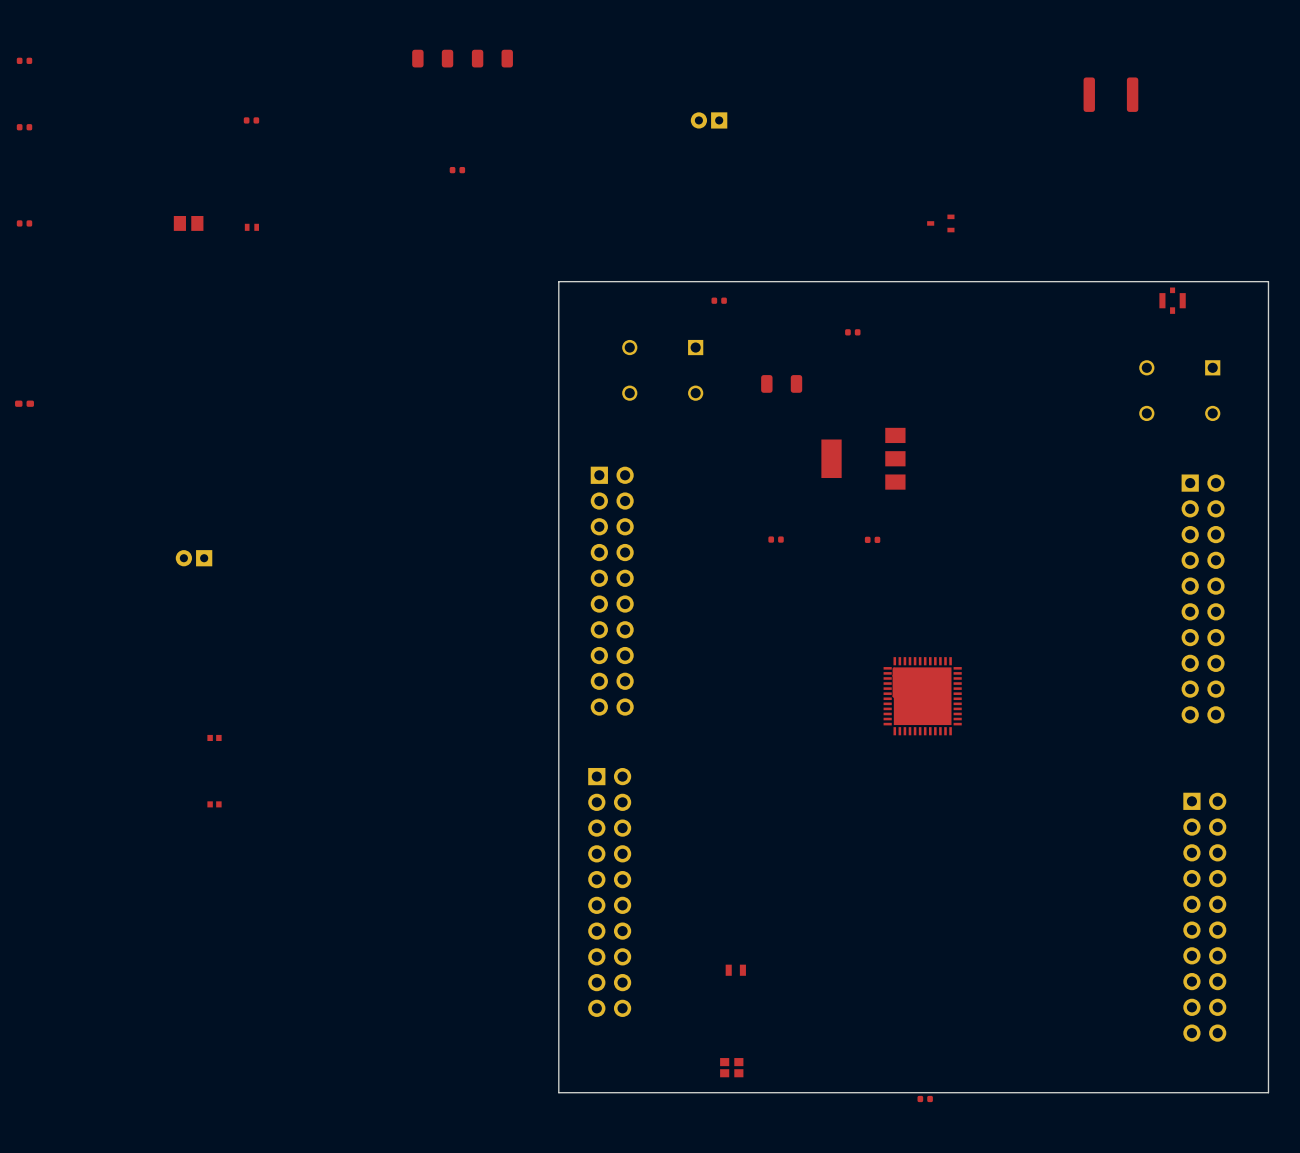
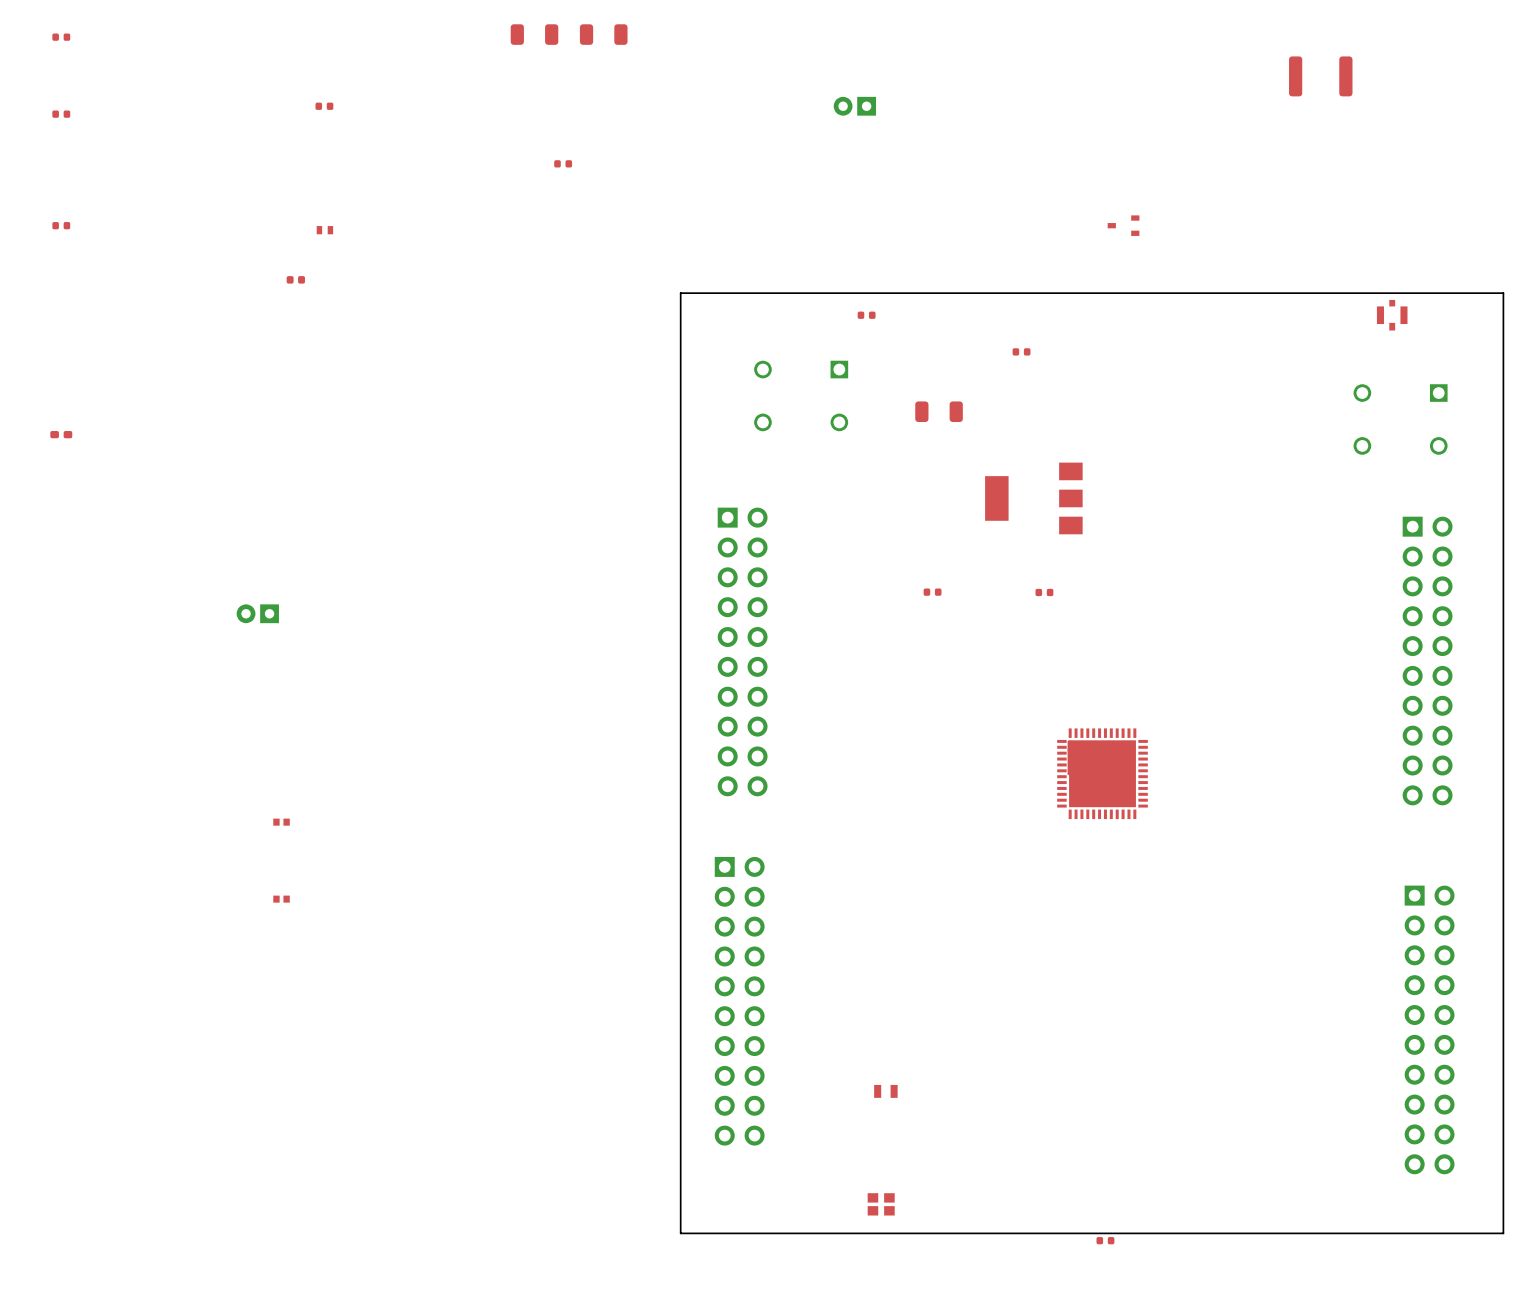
part: (188, 223) -> none
part: none -> (295, 279)

